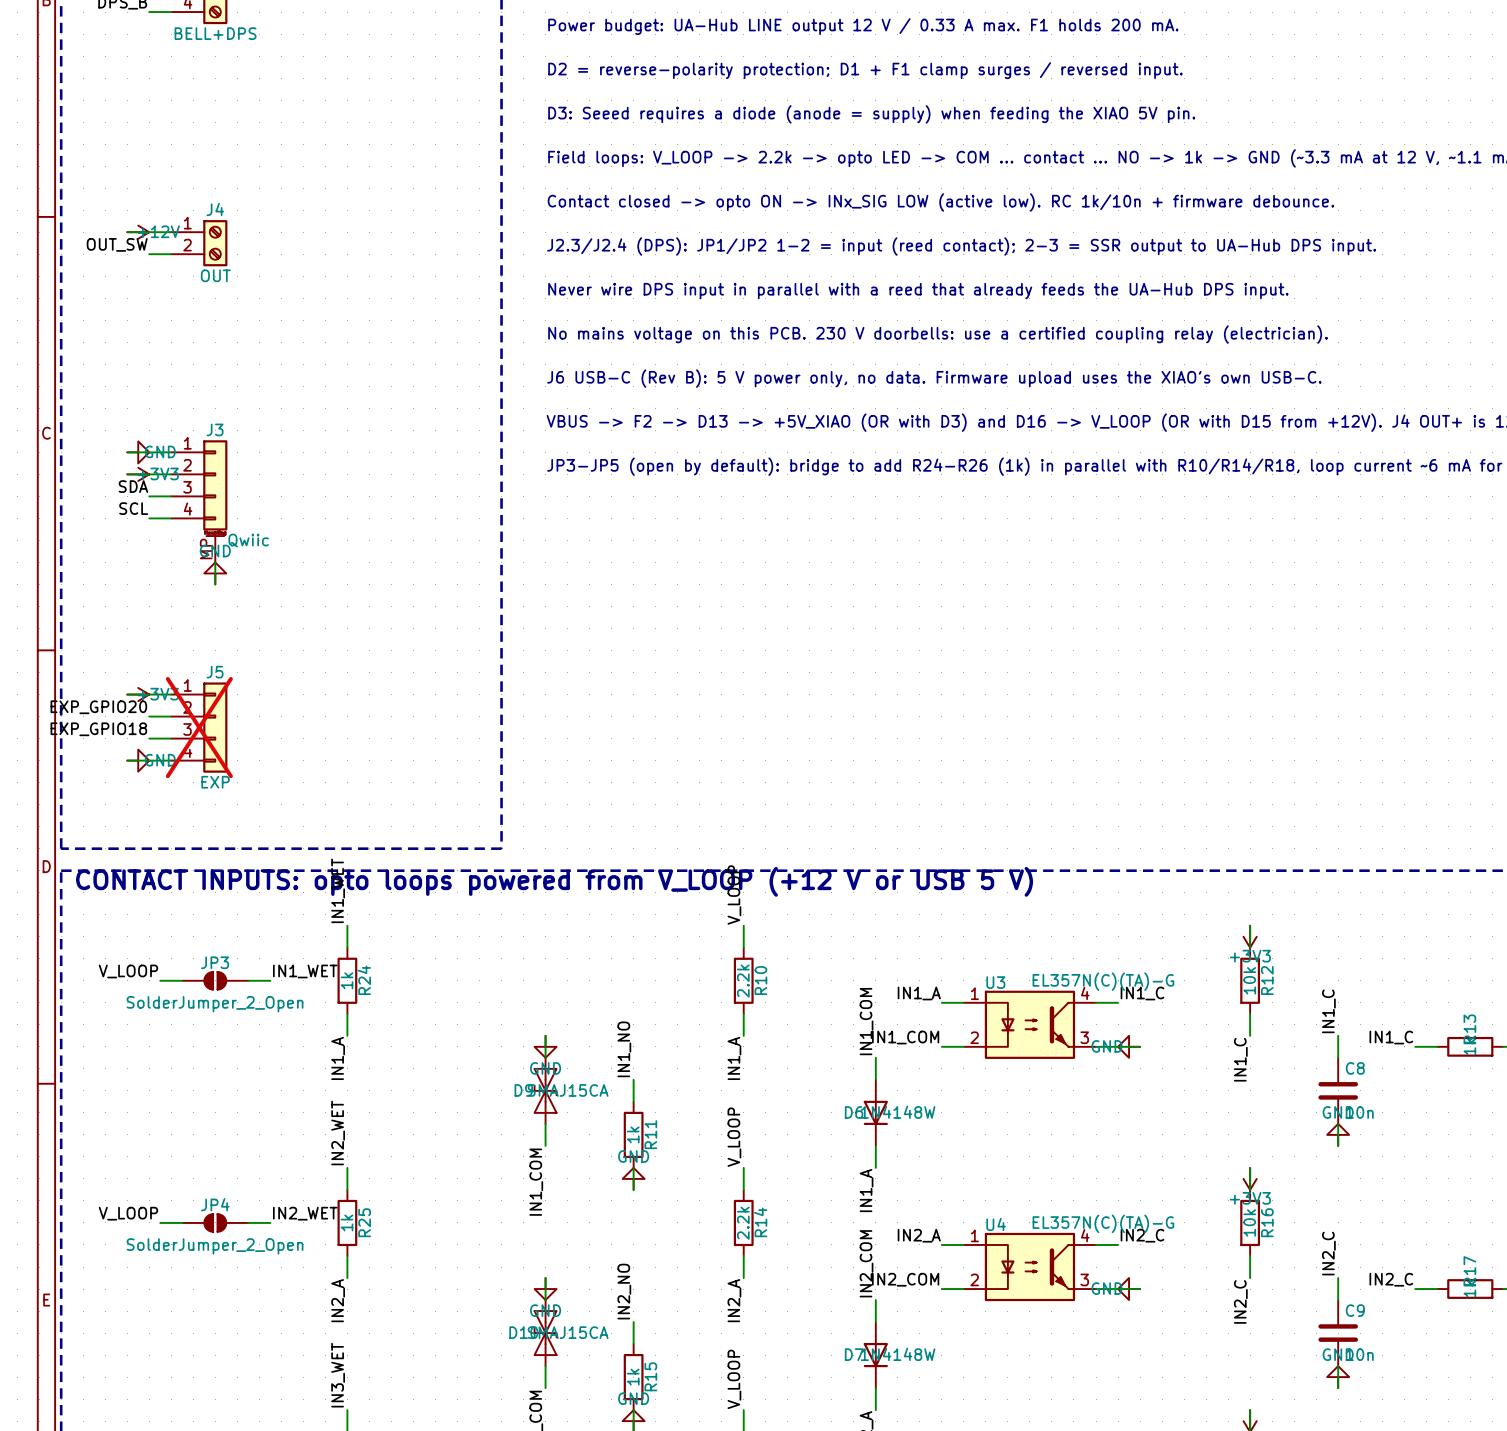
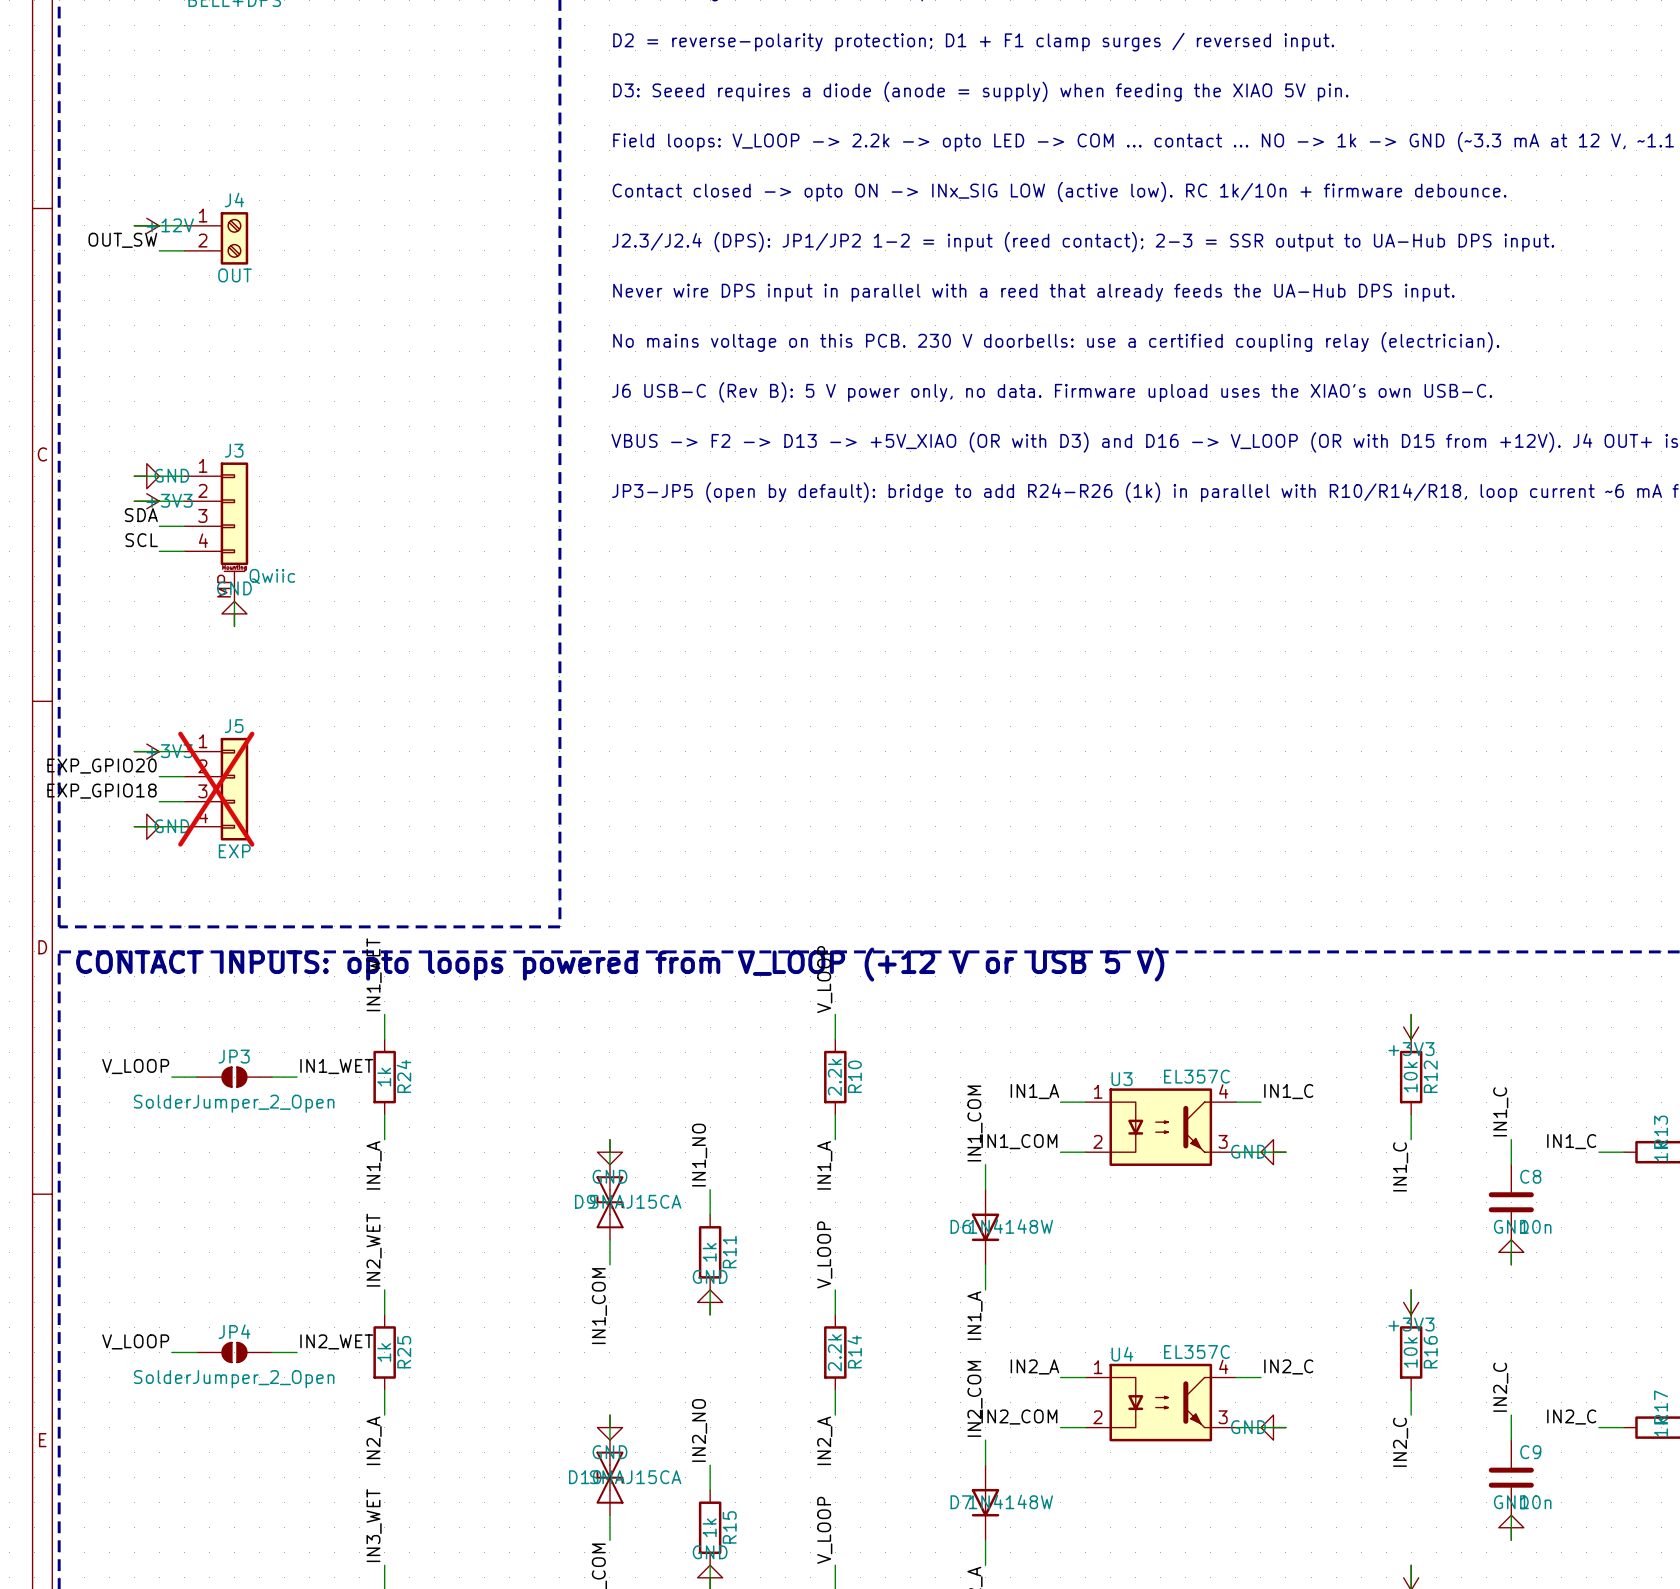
U3 value: EL357N(C)(TA)-G (1103, 981) -> EL357C (1196, 1076)
U4 value: EL357N(C)(TA)-G (1103, 1223) -> EL357C (1196, 1352)

